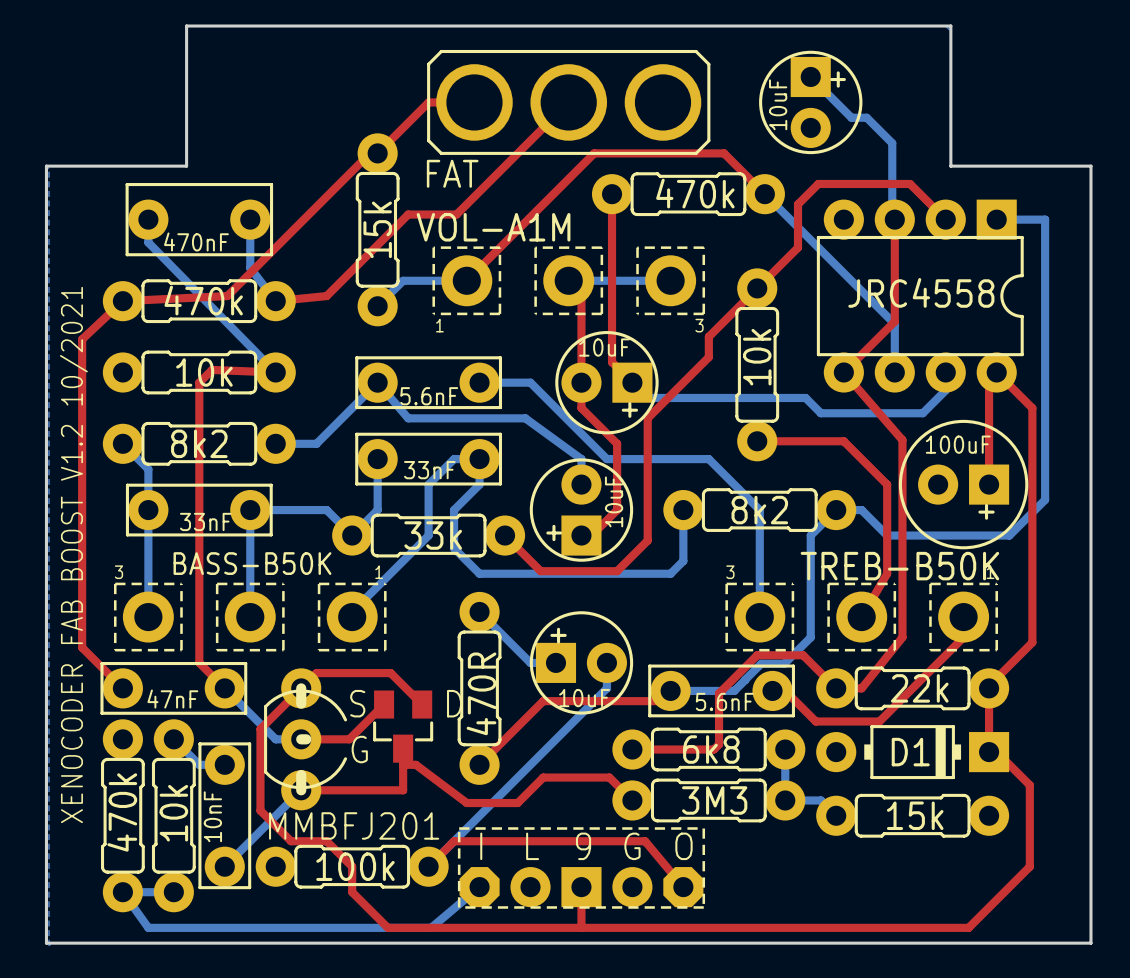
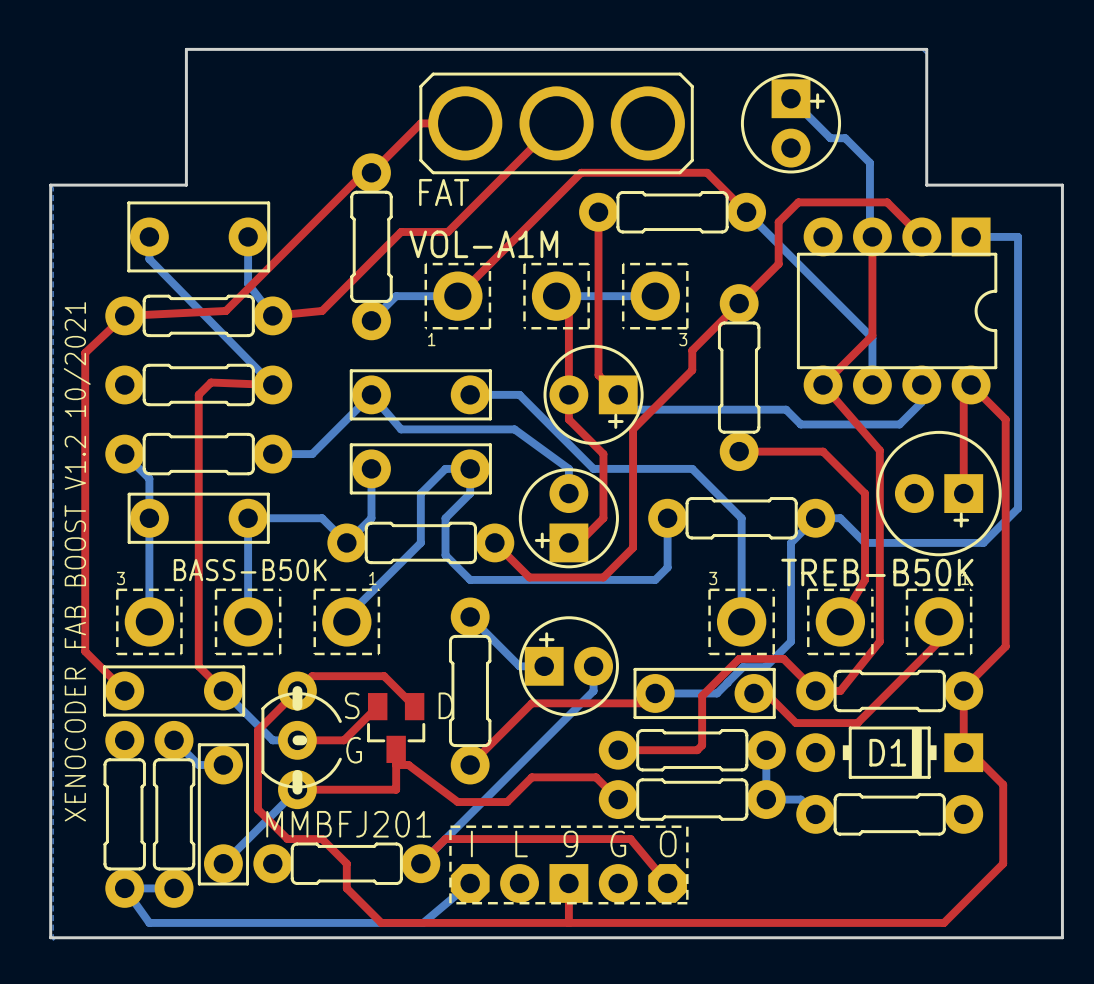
part value: 10uF (778, 104) -> none
part value: 470k (695, 193) -> none
part value: 15k (377, 229) -> none
part value: 470nF (196, 241) -> none
part value: JRC4558 (921, 292) -> none
part value: 470k (203, 300) -> none
part value: 10uF (604, 347) -> none
part value: 10k (757, 357) -> none
part value: 10k (204, 372) -> none
part value: 5.6nF (429, 396) -> none
part value: 8k2 (199, 443) -> none
part value: 100uF (958, 444) -> none
part value: 33nF (429, 470) -> none
part value: 10uF (614, 501) -> none
part value: 8k2 (759, 510) -> none
part value: 33nF (205, 521) -> none
part value: 33k (433, 535) -> none
part value: 22k (919, 688) -> none
part value: 470R (481, 693) -> none
part value: 10uF (584, 698) -> none
part value: 47nF (172, 699) -> none
part value: 5.6nF (724, 701) -> none
part value: 6k8 (711, 749) -> none
part value: 3M3 (714, 800) -> none
part value: 470k (122, 812) -> none
part value: 10k (173, 813) -> none
part value: 15k (915, 815) -> none
part value: 10nF (212, 816) -> none
part value: 100k (355, 866) -> none

